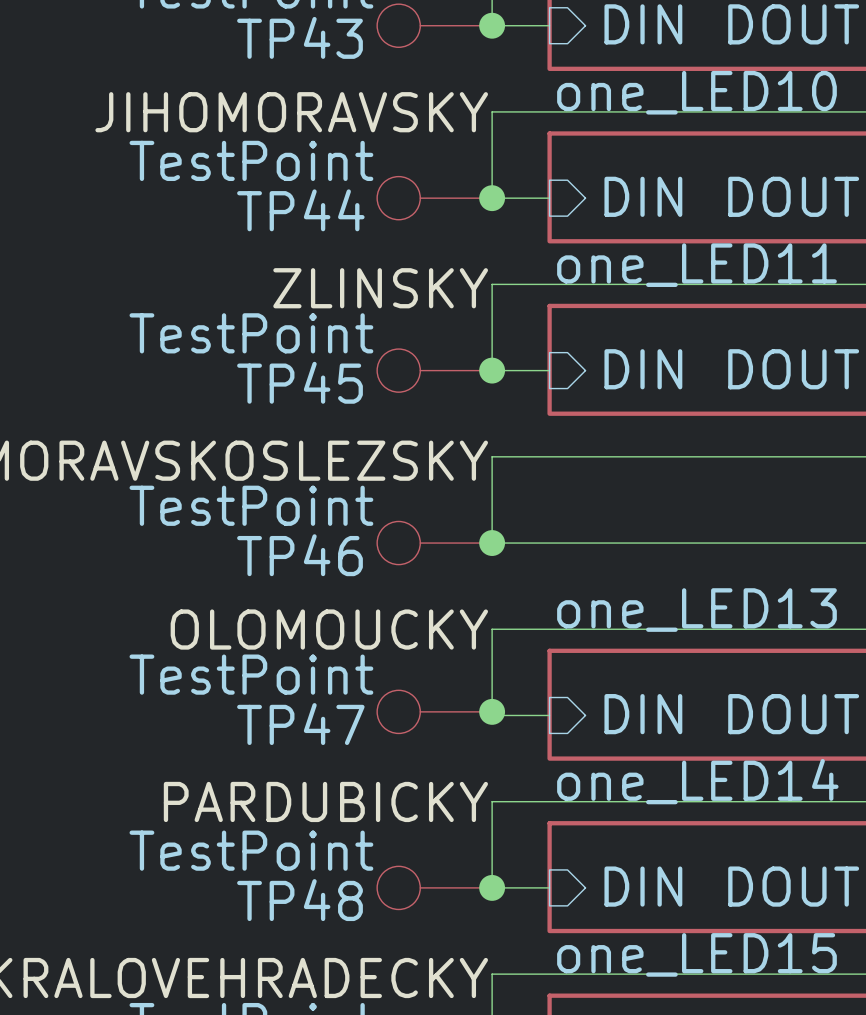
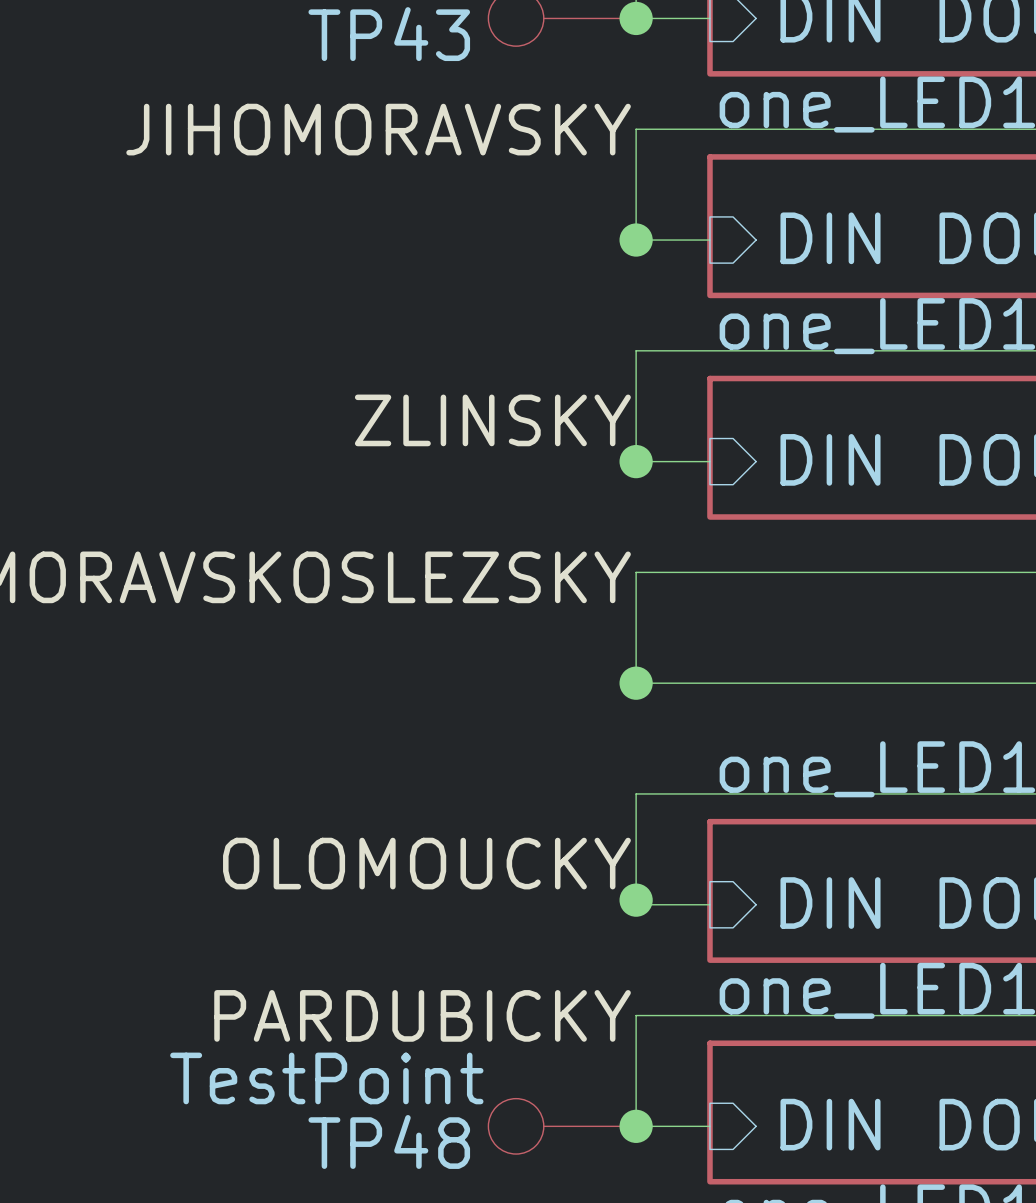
TP44: TestPoint (434, 198) -> none
label position: ZLINSKY (380, 288) -> ZLINSKY (492, 420)
TP45: TestPoint (434, 370) -> none
TP46: TestPoint (434, 543) -> none
label position: OLOMOUCKY (329, 629) -> OLOMOUCKY (426, 863)
TP47: TestPoint (434, 711) -> none

